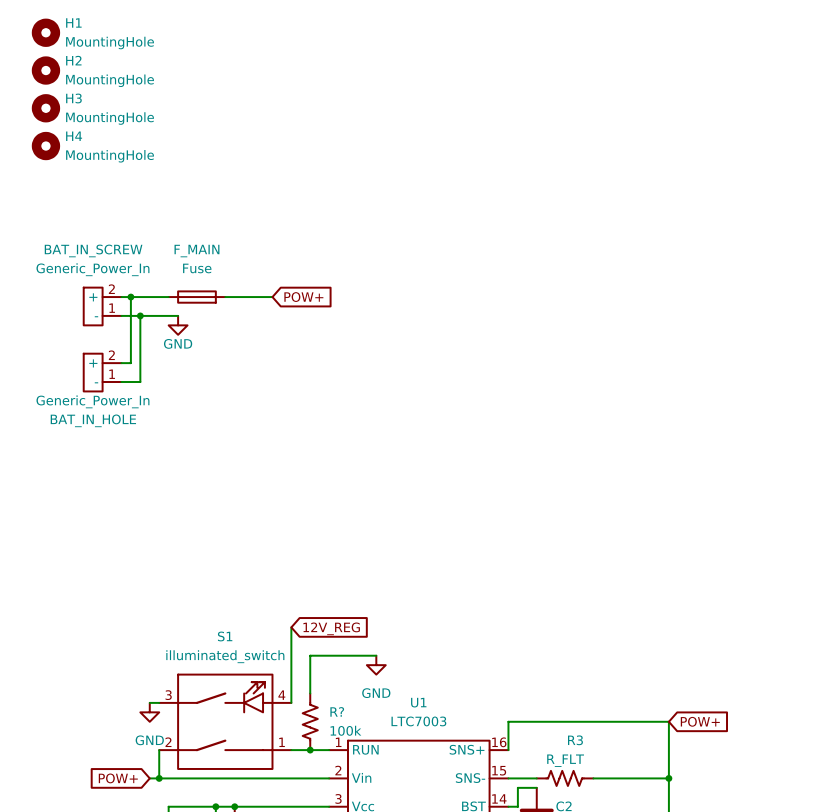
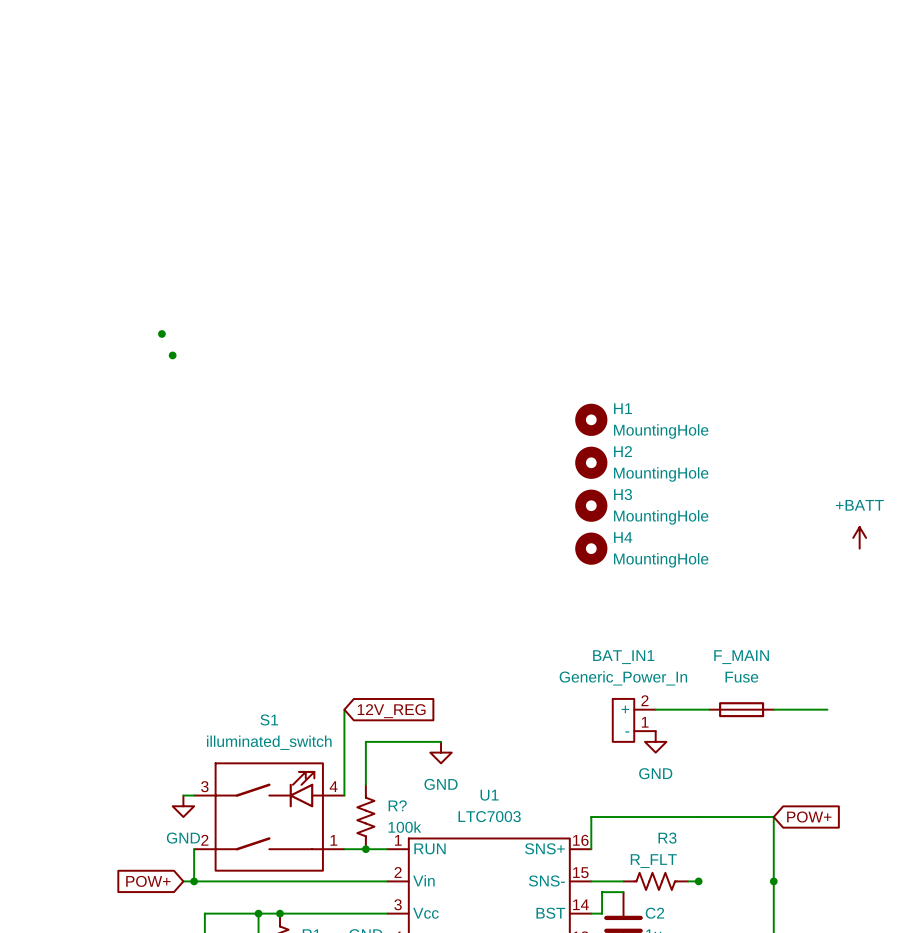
H1 position: (45, 32) -> (591, 419)
H2 position: (45, 70) -> (591, 462)
H3 position: (45, 108) -> (591, 505)
H4 position: (45, 146) -> (591, 548)
wire: (121, 297) (168, 297) -> none
wire: (130, 297) (130, 363) (121, 363) -> none
F_MAIN: Fuse (196, 297) -> none
wire: (225, 297) (272, 297) -> none
global label: POW+ (303, 297) -> none
BAT_IN_SCREW: Generic_Power_In (102, 306) -> none
wire: (121, 315) (178, 315) -> none
wire: (140, 315) (140, 381) (121, 381) -> none
power symbol: GND (178, 325) -> none
BAT_IN_HOLE: Generic_Power_In (102, 372) -> none
power symbol: none -> +BATT (859, 537)
wire: none -> (655, 709) (709, 709)
F_MAIN: none -> Fuse (741, 709)
wire: none -> (773, 709) (827, 709)
BAT_IN1: none -> Generic_Power_In (634, 720)
power symbol: none -> GND (655, 741)
wire: (602, 778) (668, 778) -> none
junction: none -> (698, 881)

